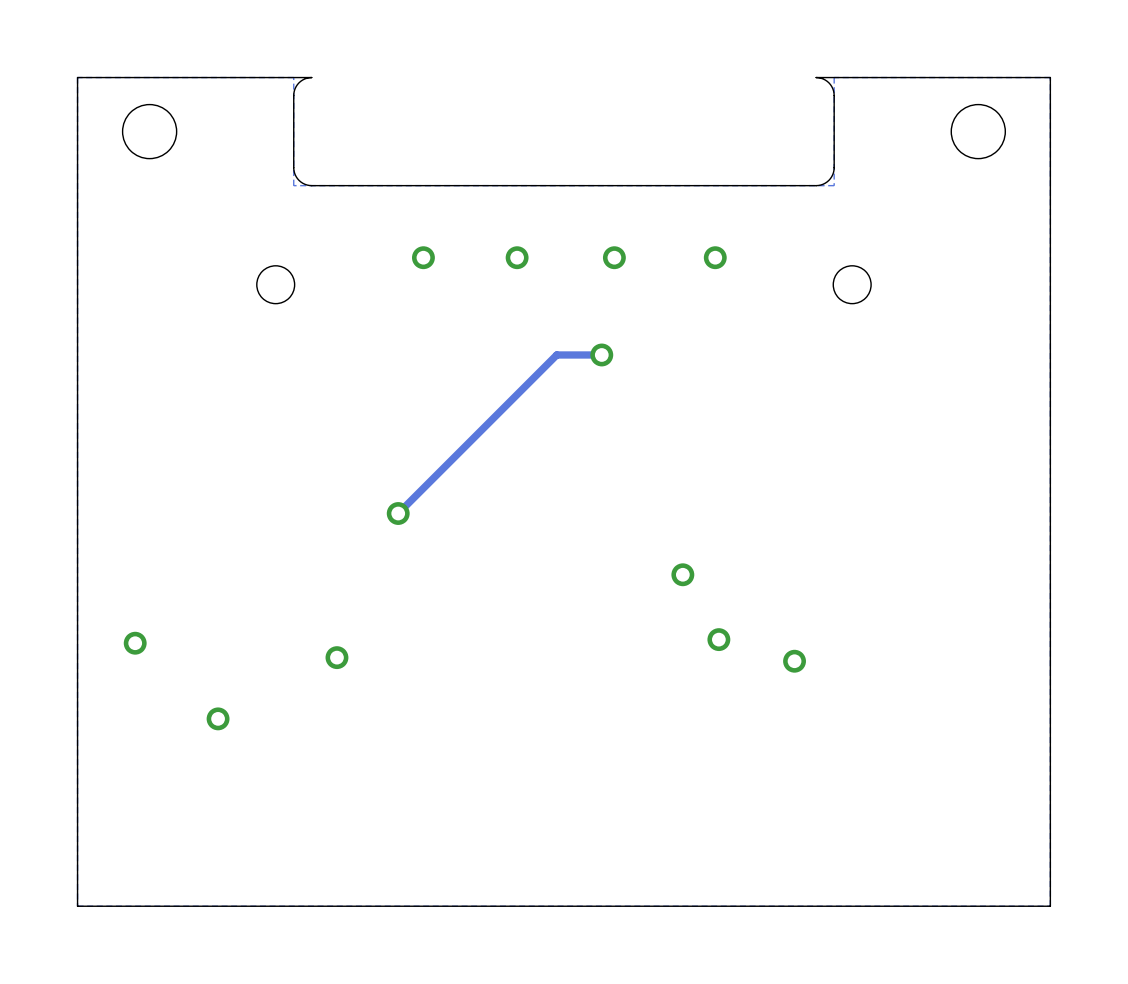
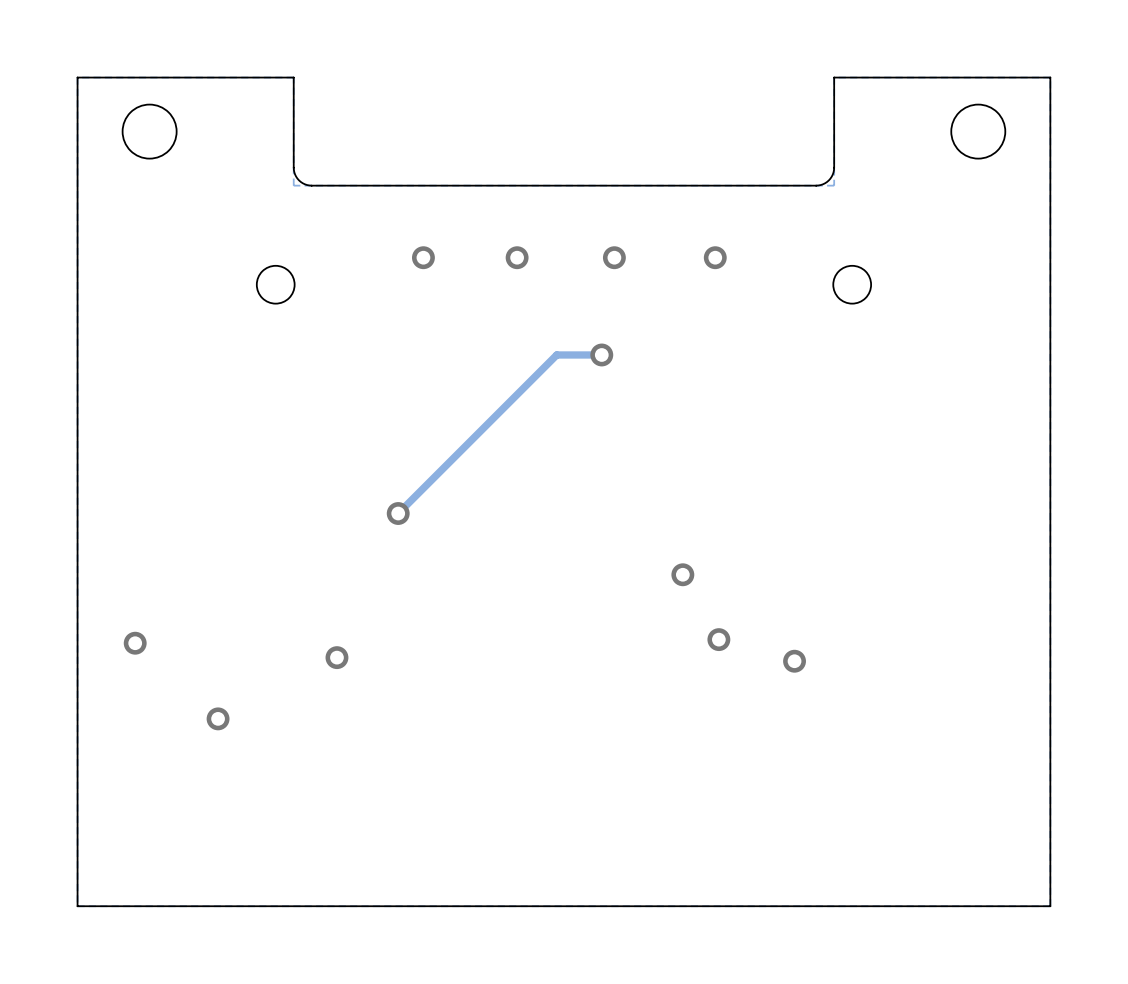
board edge: (293, 77) (311, 77) (299, 82) (293, 95) -> (293, 77) (293, 95)
board edge: (834, 77) (816, 77) (828, 82) (834, 95) -> (834, 77) (834, 95)

